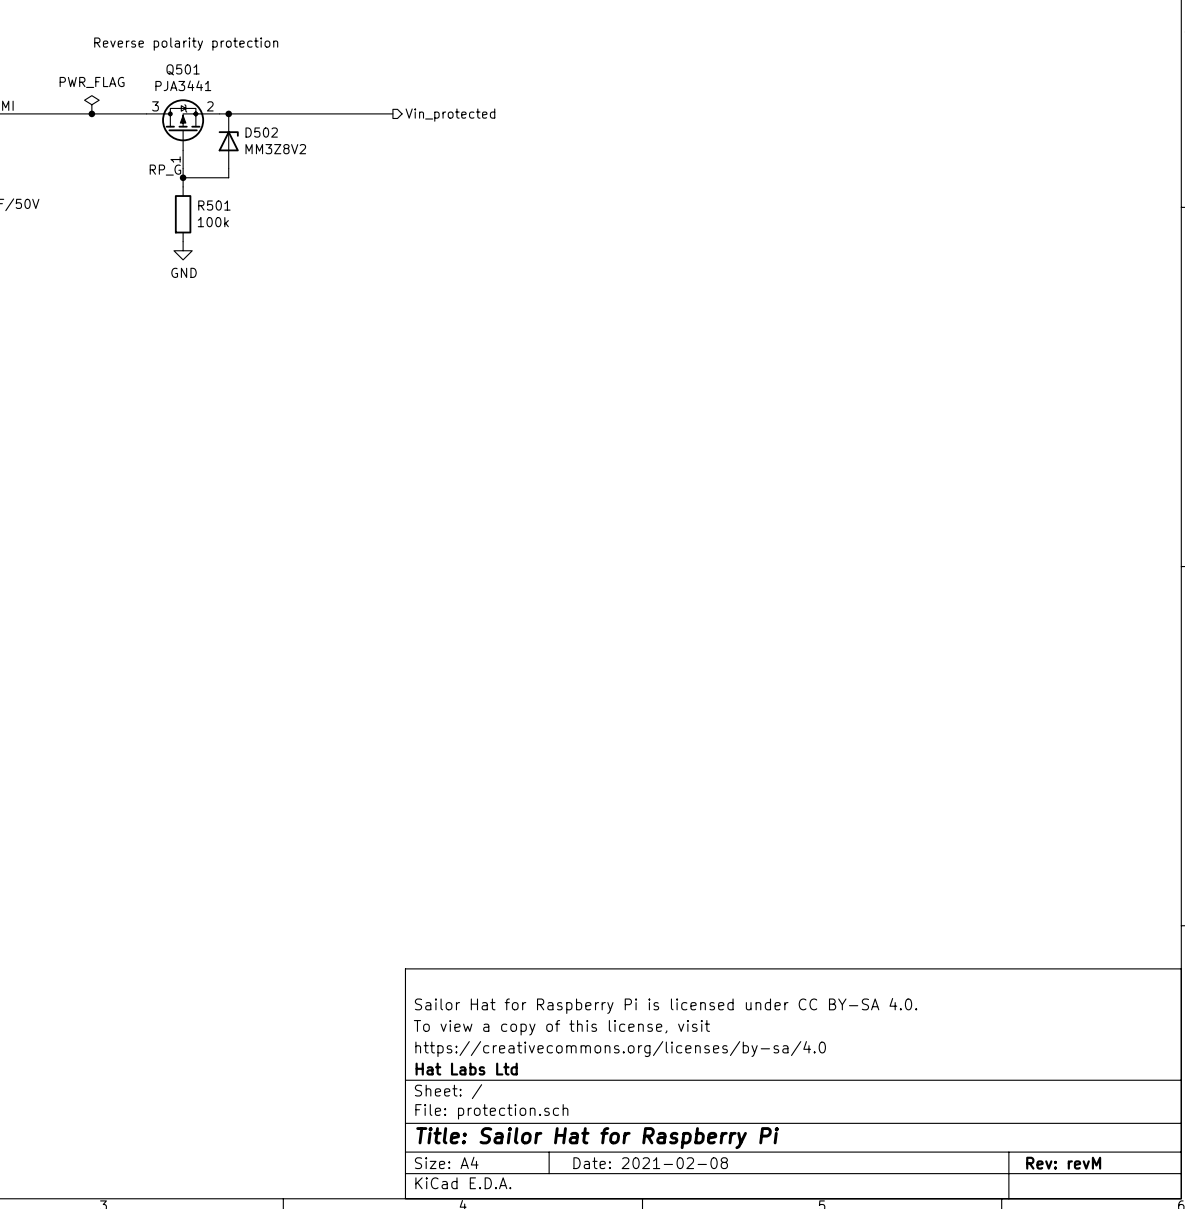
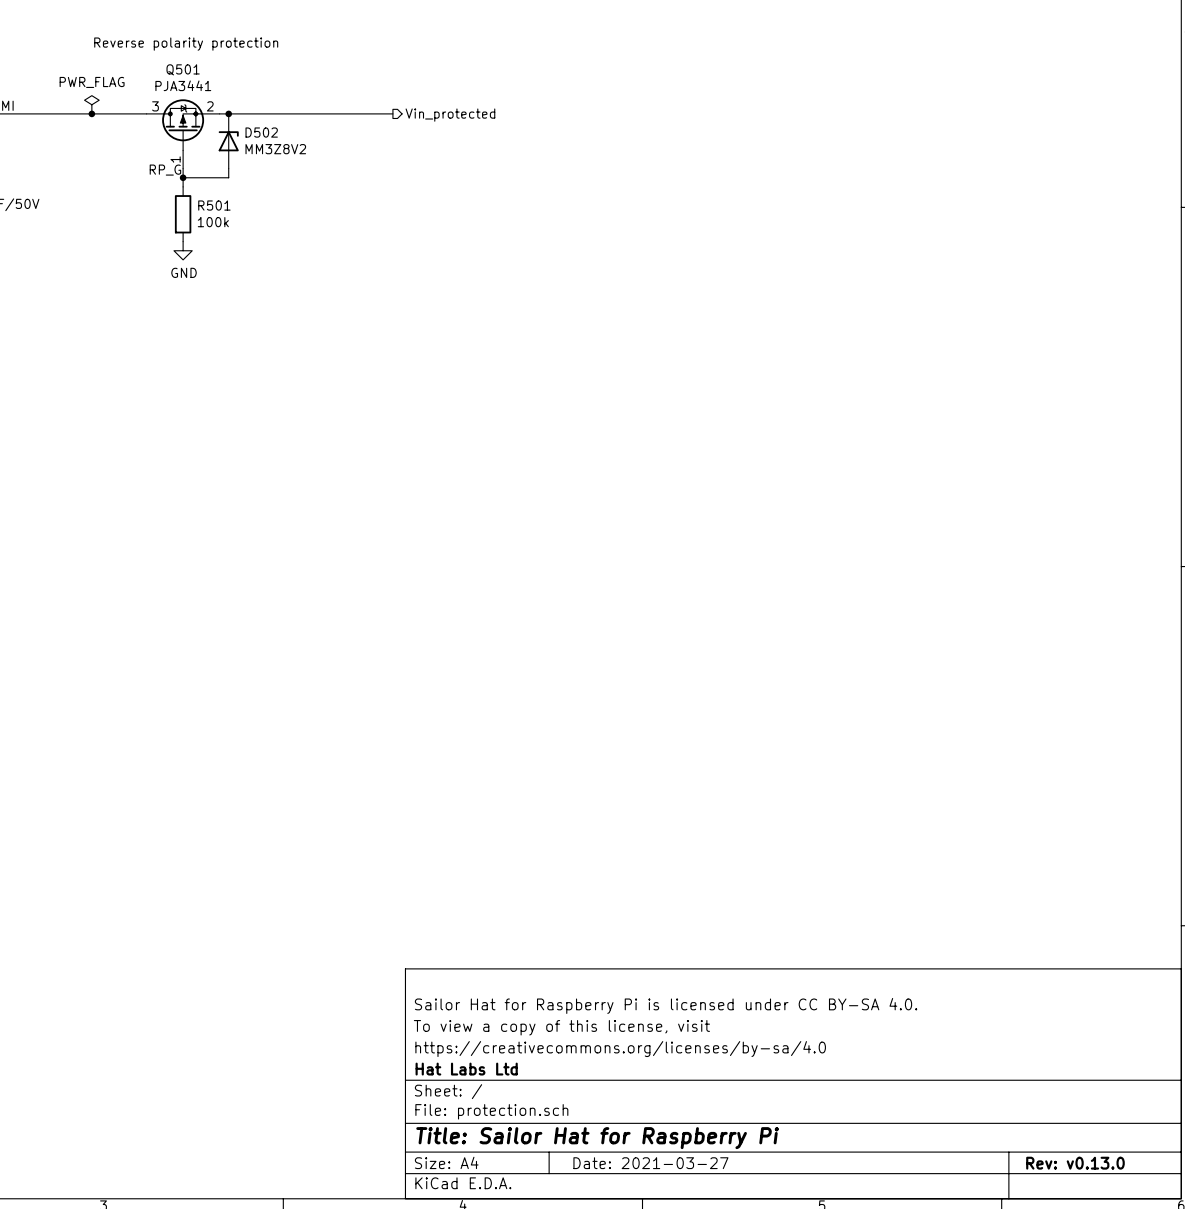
title block: Date: 2021-02-08 (650, 1163) -> Date: 2021-03-27 (650, 1163)
title block: Rev: revM (1063, 1163) -> Rev: v0.13.0 (1075, 1163)

